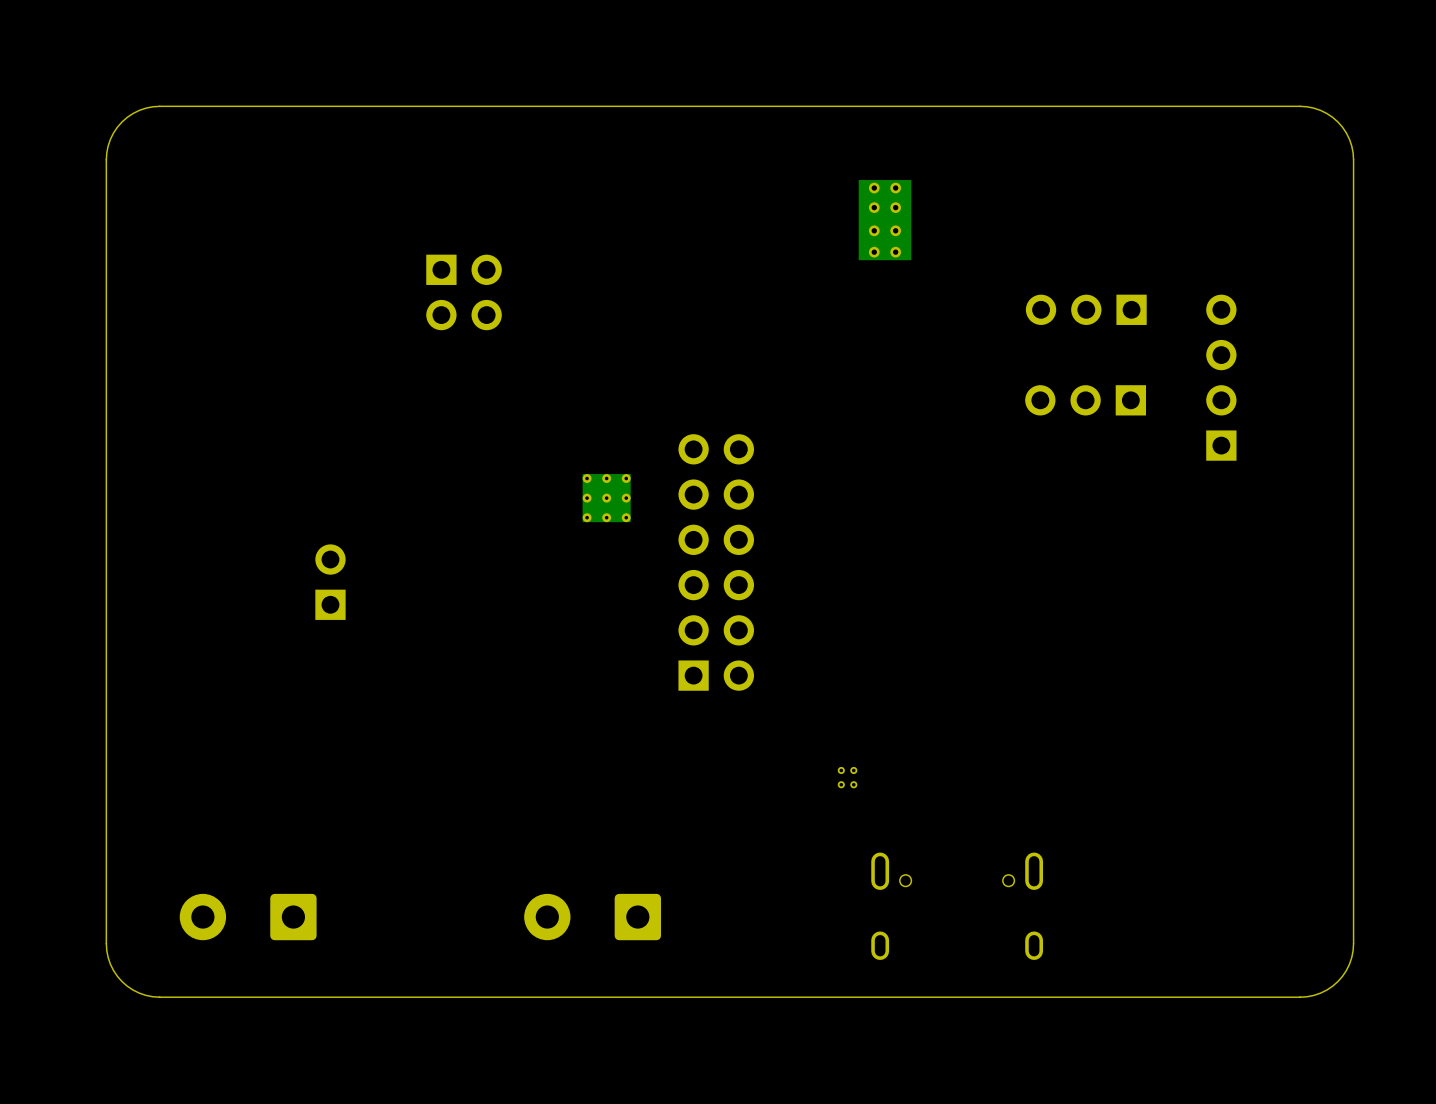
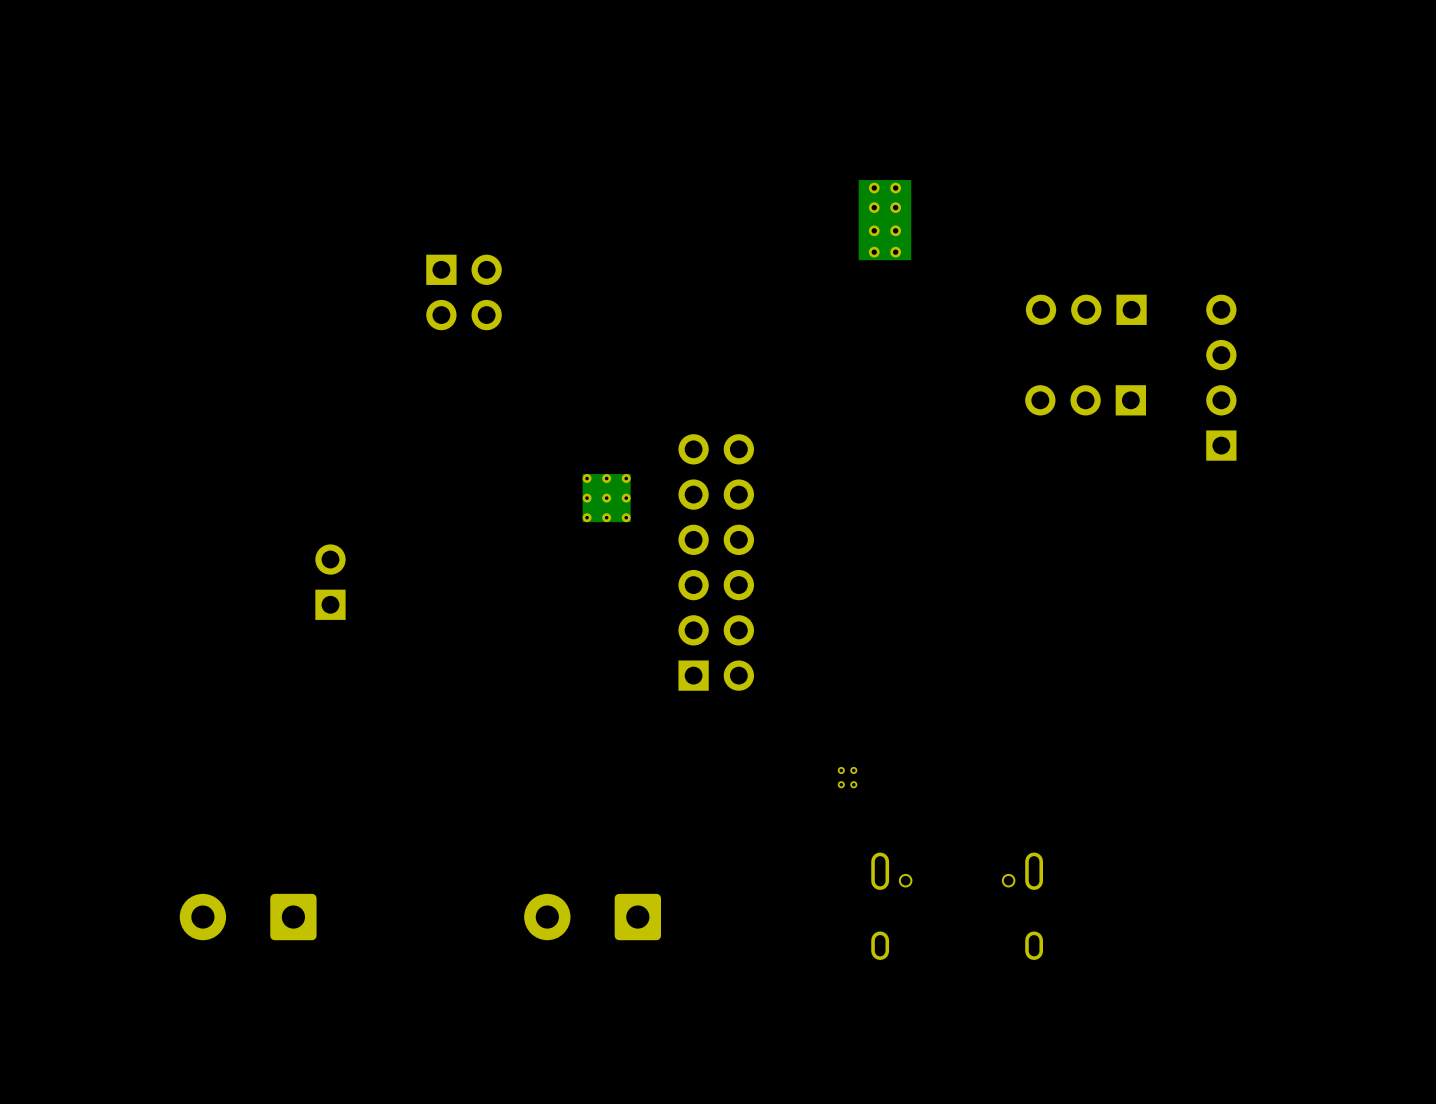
board edge: (1300, 106) (159, 106) (139, 110) (127, 117) (117, 127) (110, 139) (106, 159) (106, 943) (108, 957) (117, 976) (133, 990) (145, 995) (159, 997) (1300, 997) (1313, 995) (1332, 986) (1342, 976) (1349, 964) (1353, 943) (1353, 159) (1349, 139) (1337, 121) (1320, 110) (1300, 106) -> none

